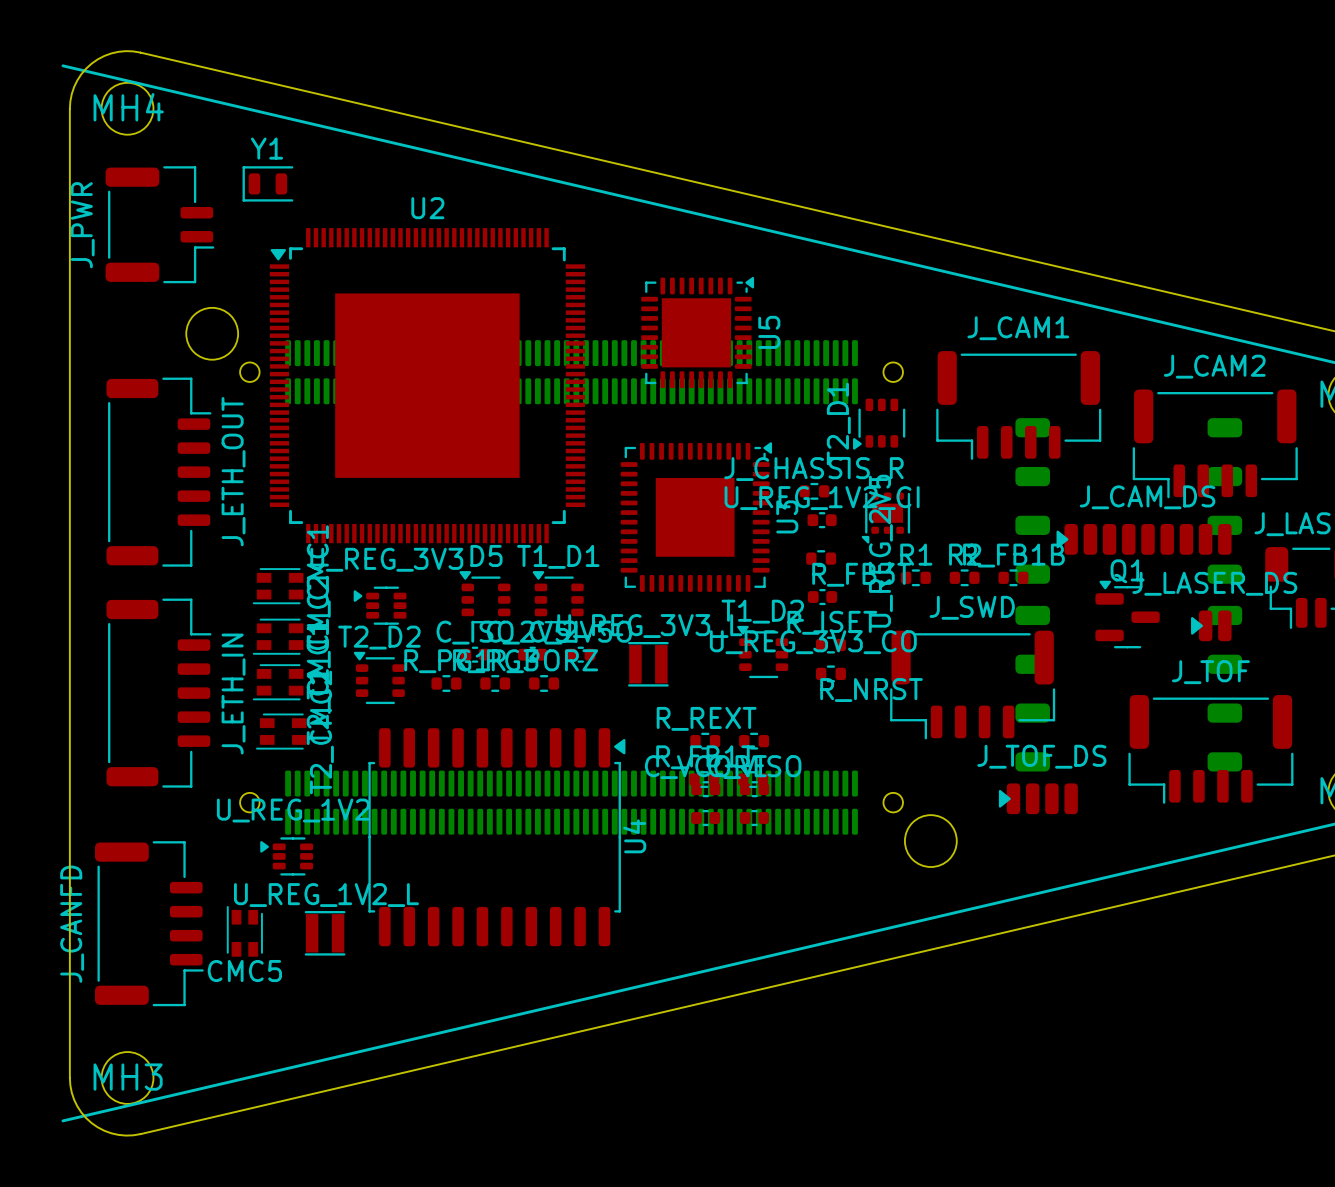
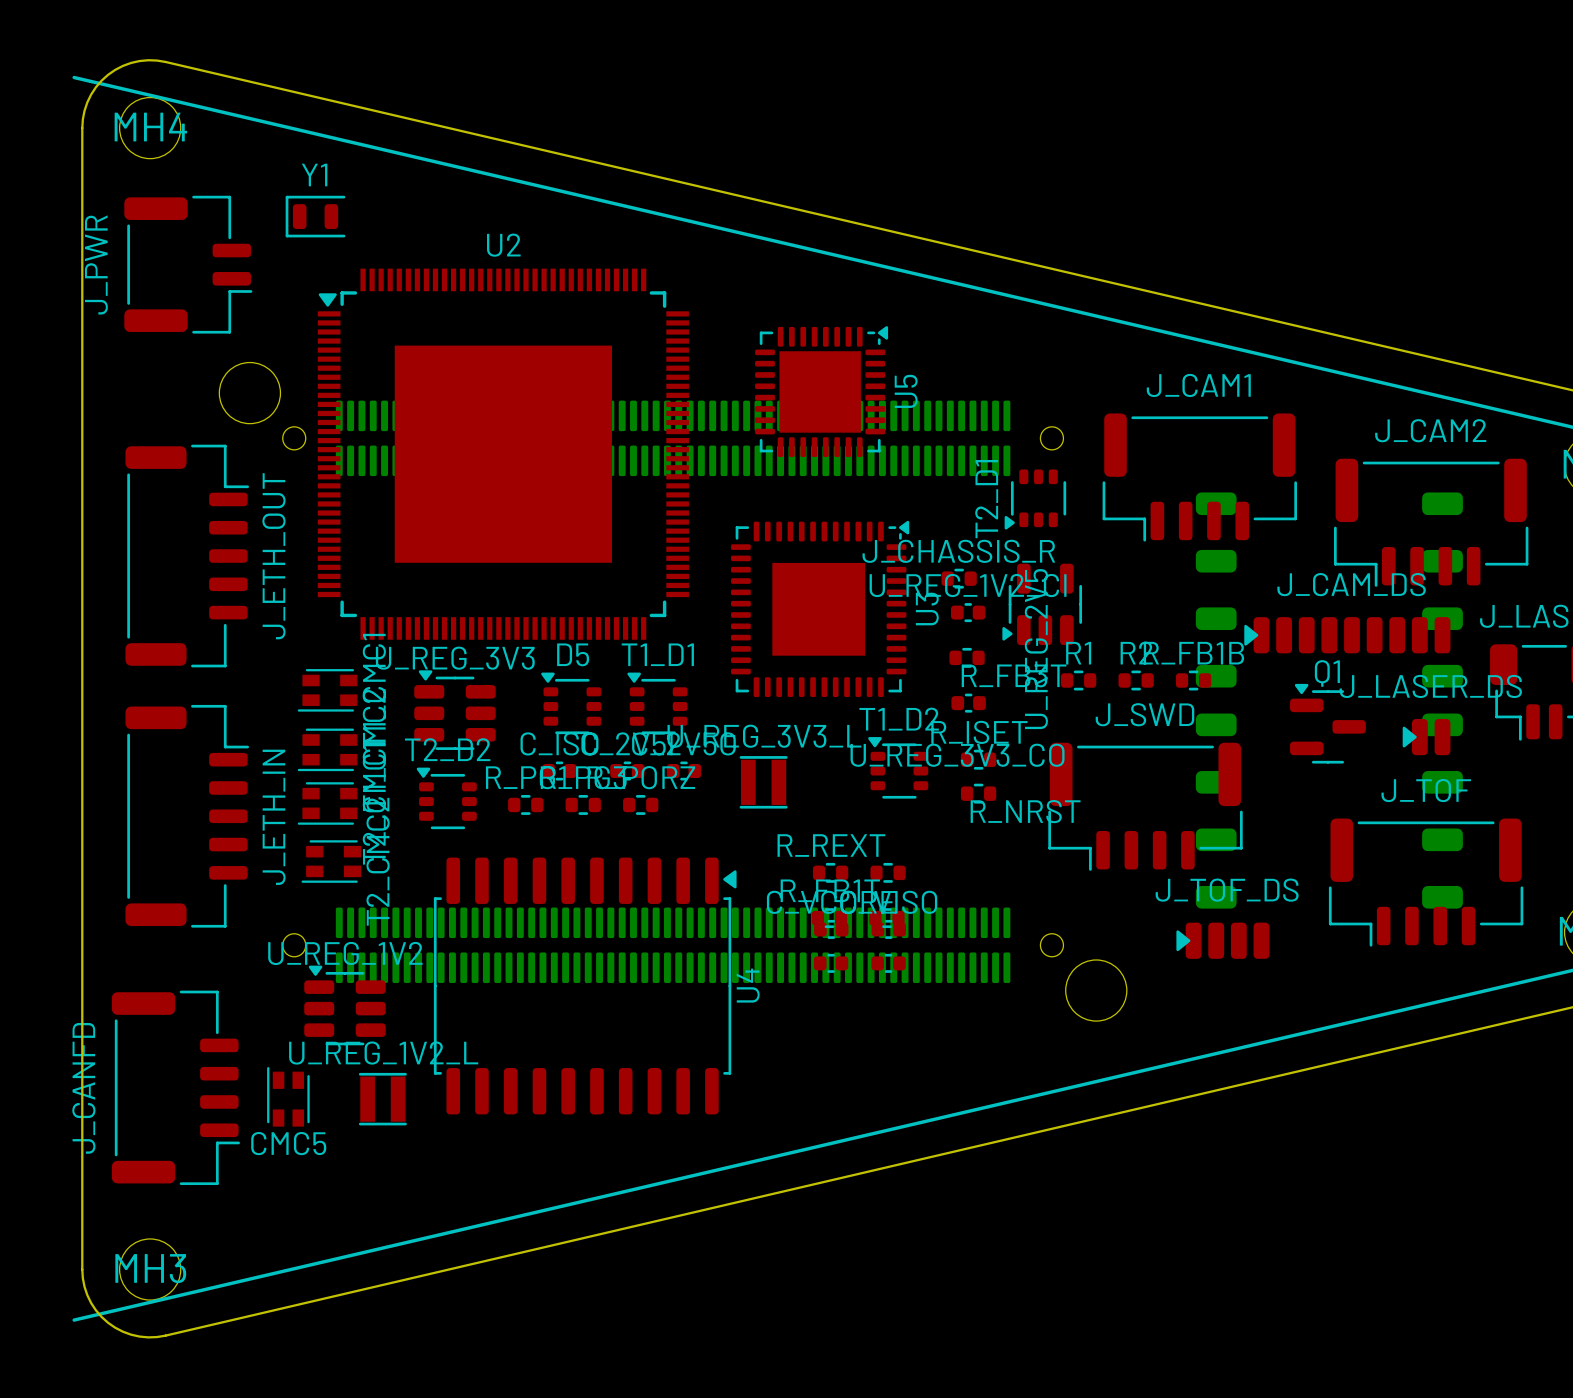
U_REG_2V5 footprint: [861, 492, 911, 544] -> [1002, 563, 1083, 646]
U_REG_3V3 footprint: [353, 586, 407, 625] -> [414, 670, 496, 750]
U_REG_1V2 footprint: [260, 837, 314, 876] -> [304, 965, 386, 1046]

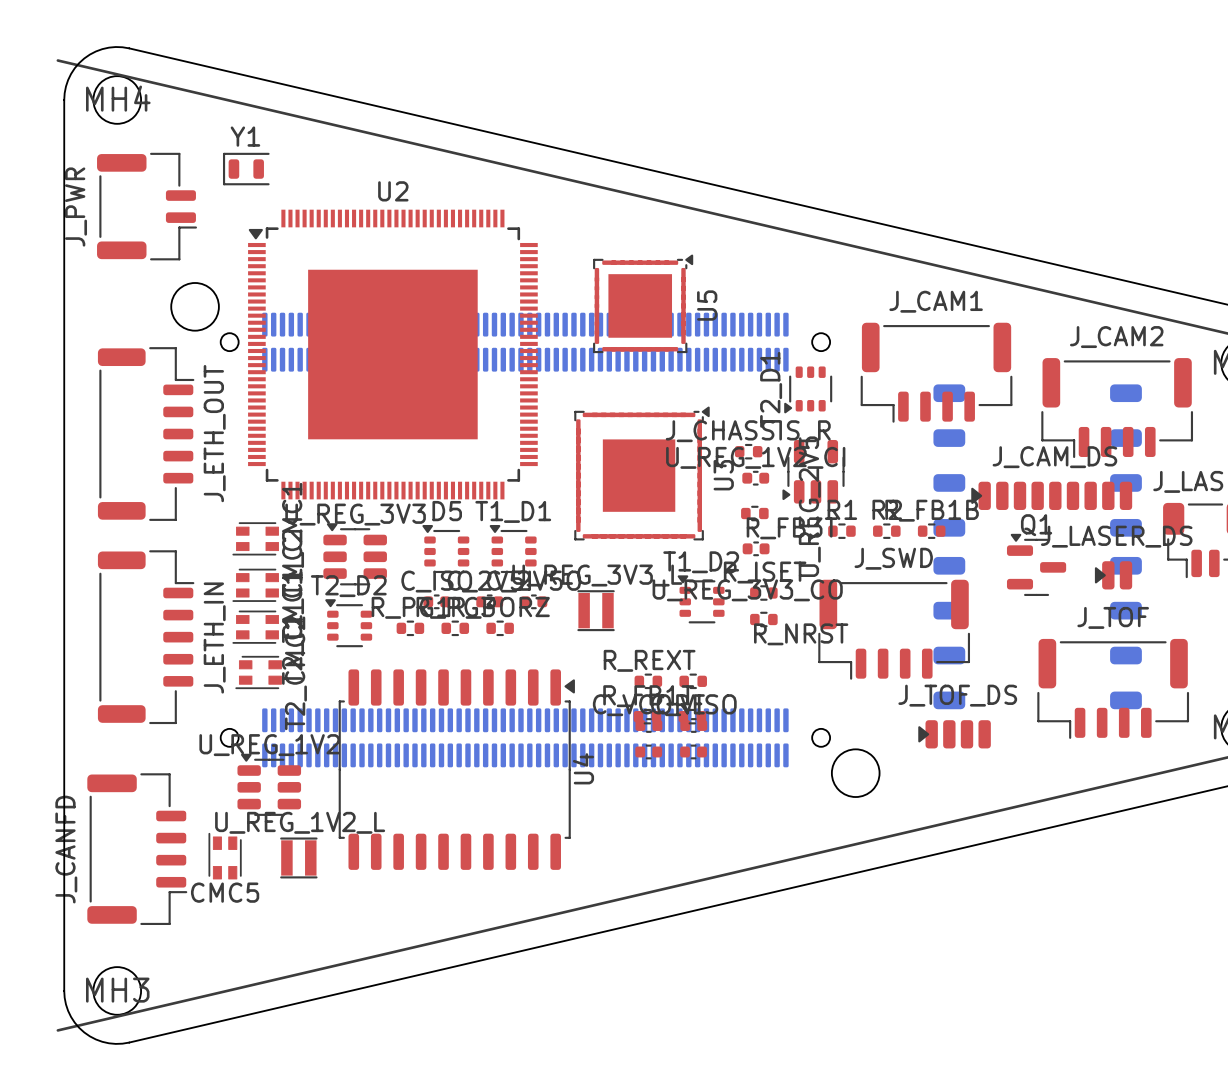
U5 footprint: [755, 326, 889, 458] -> [593, 254, 694, 354]
U3 footprint: [731, 520, 910, 698] -> [574, 406, 710, 541]

